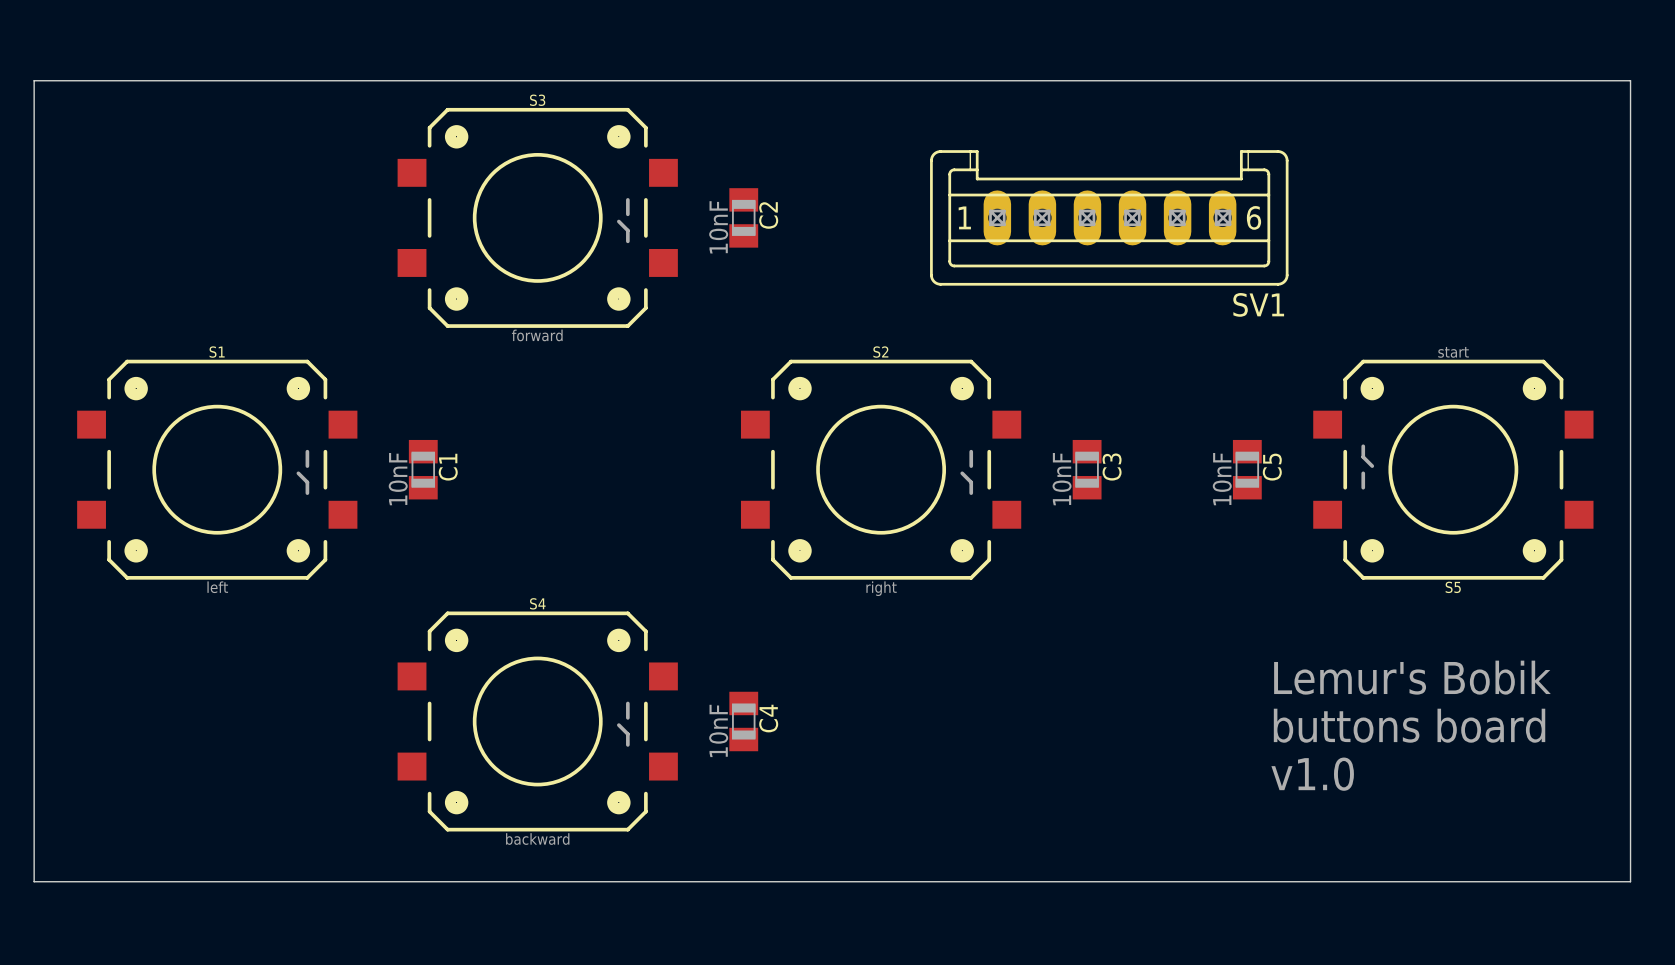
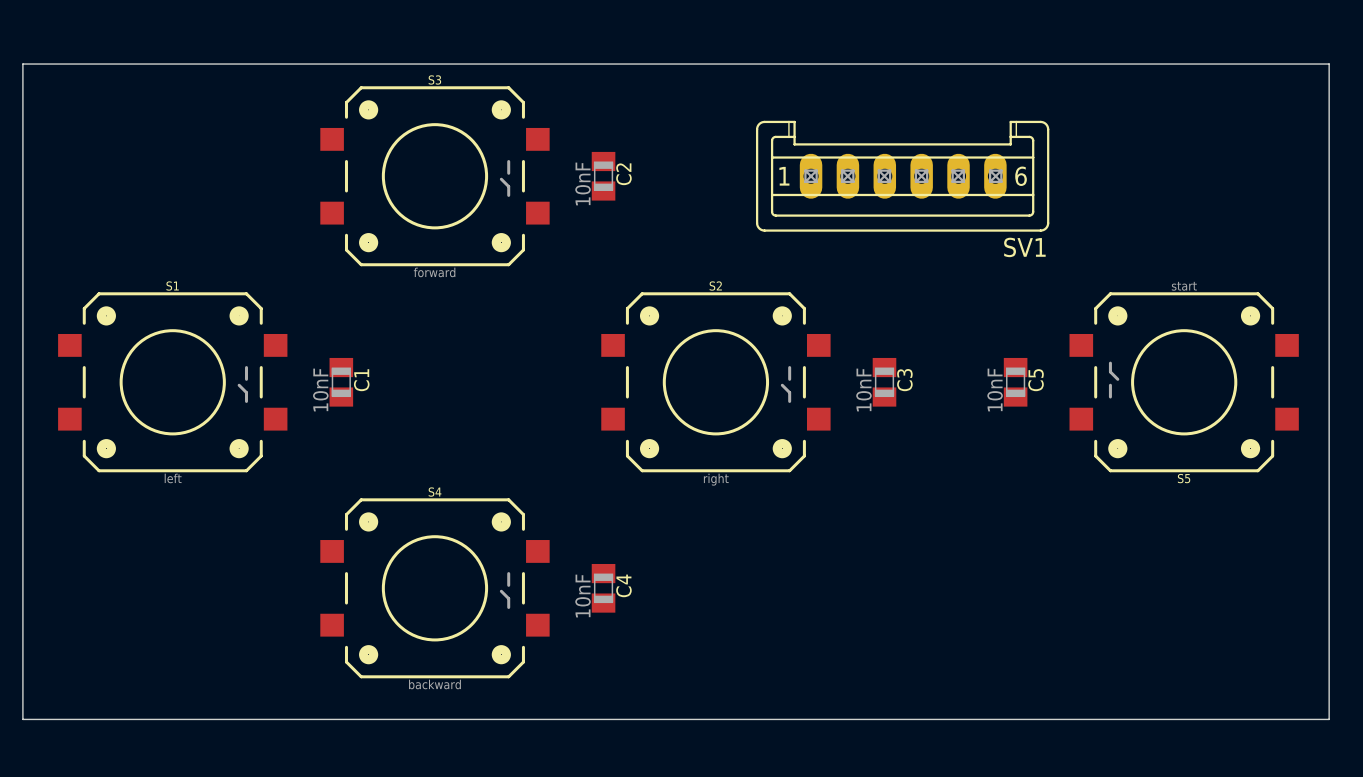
text: Lemur's Bobik (1412, 677) -> none
text: buttons board (1409, 725) -> none
text: v1.0 (1312, 774) -> none

